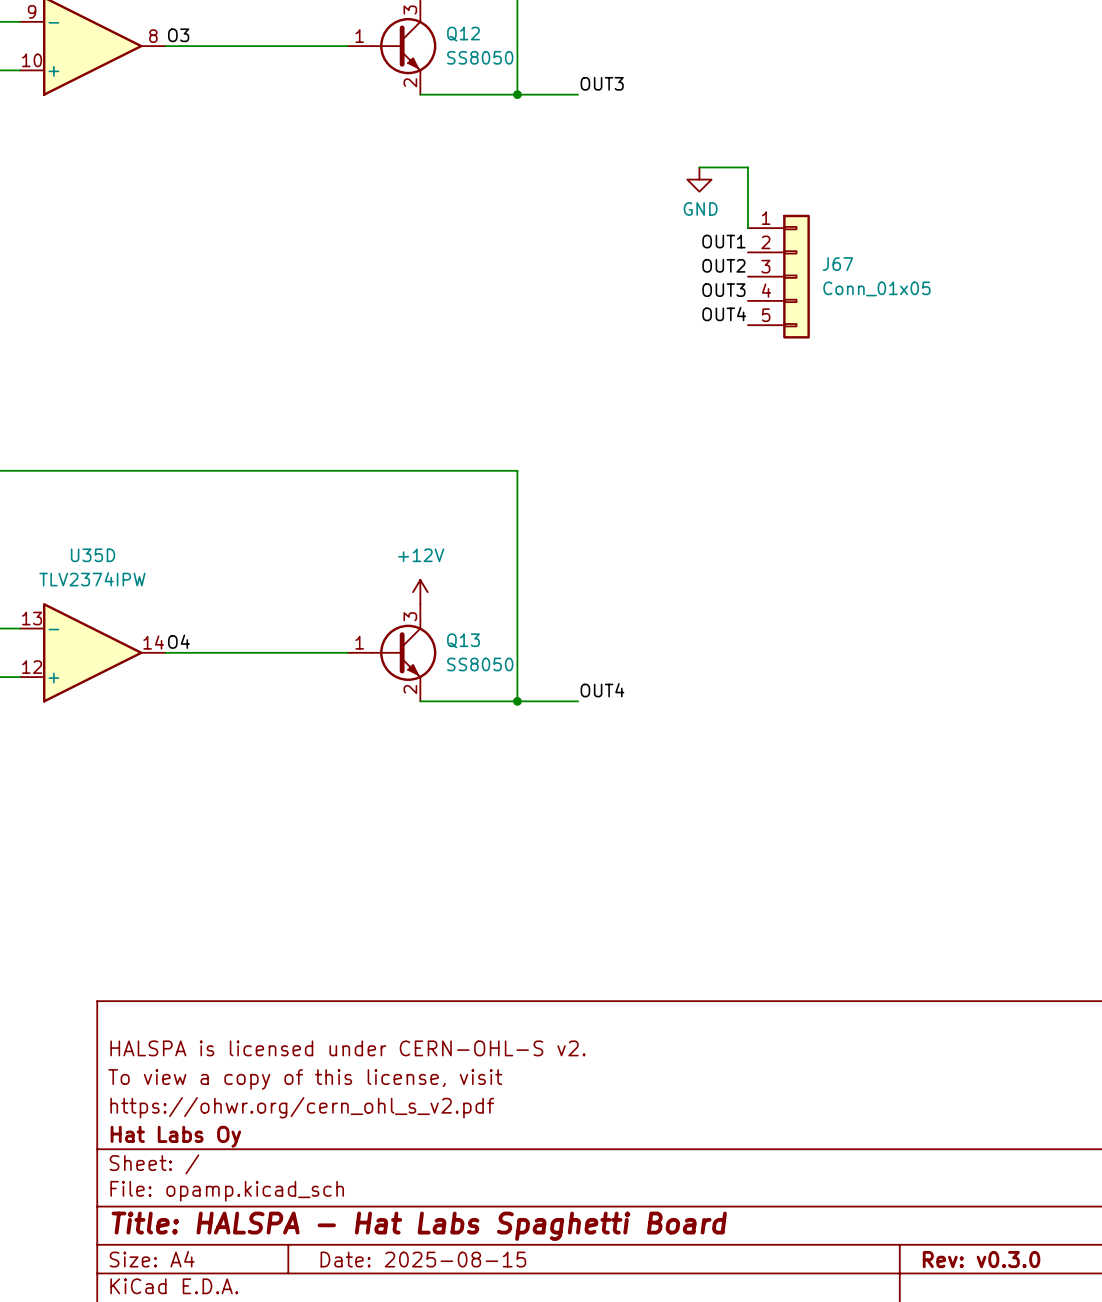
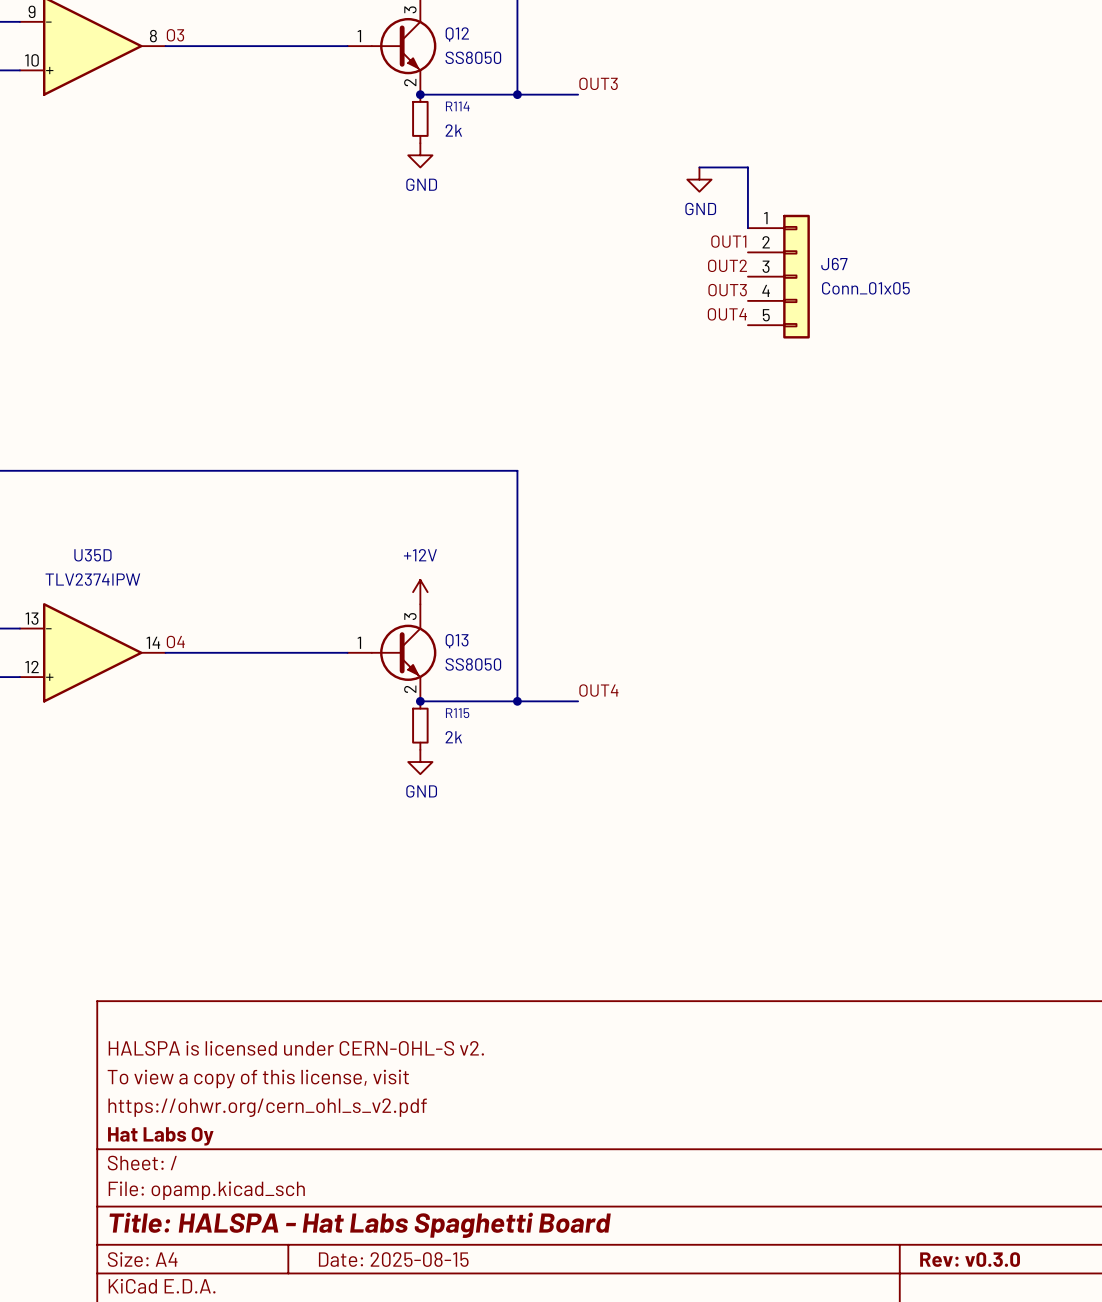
junction: none -> (420, 94)
R114: none -> 2k (420, 118)
power symbol: none -> GND (420, 155)
junction: none -> (420, 701)
R115: none -> 2k (420, 725)
power symbol: none -> GND (420, 762)

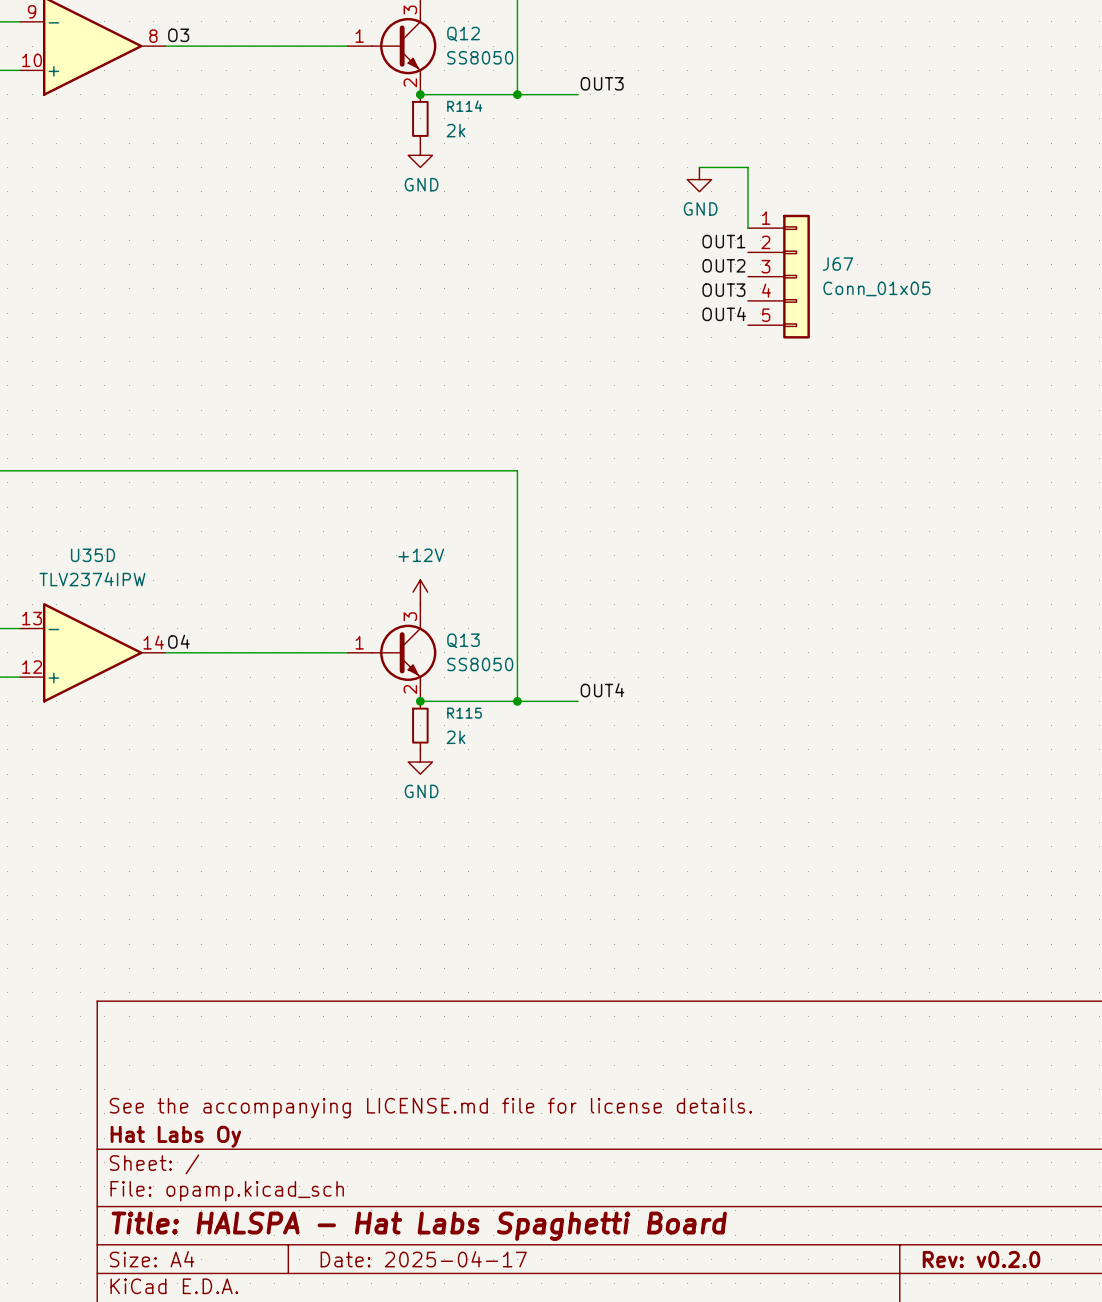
title block: HALSPA is licensed under CERN-OHL-S v2. (296, 1048) -> none
title block: To view a copy of this license, visit (258, 1079) -> none
title block: https://ohwr.org/cern_ohl_s_v2.pdf (267, 1107) -> See the accompanying LICENSE.md file for license details. (430, 1108)
title block: Date: 2025-08-15 (393, 1259) -> Date: 2025-04-17 (423, 1259)
title block: Rev: v0.3.0 (970, 1259) -> Rev: v0.2.0 (981, 1259)

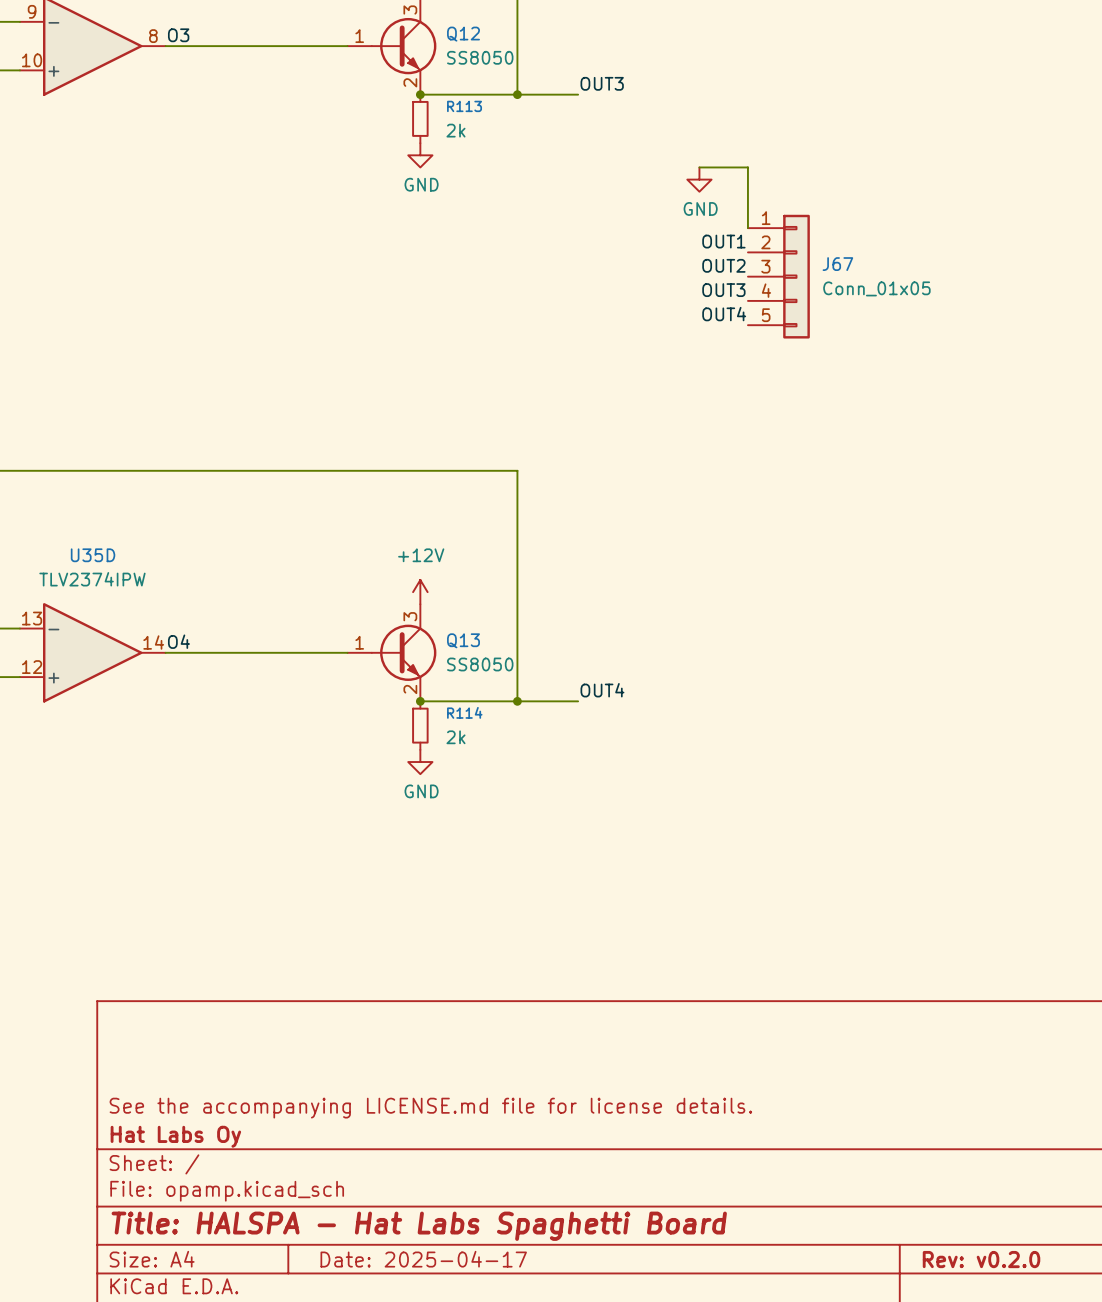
R114 name: R114 (464, 106) -> R113 (464, 106)
R115 name: R115 (464, 713) -> R114 (464, 712)

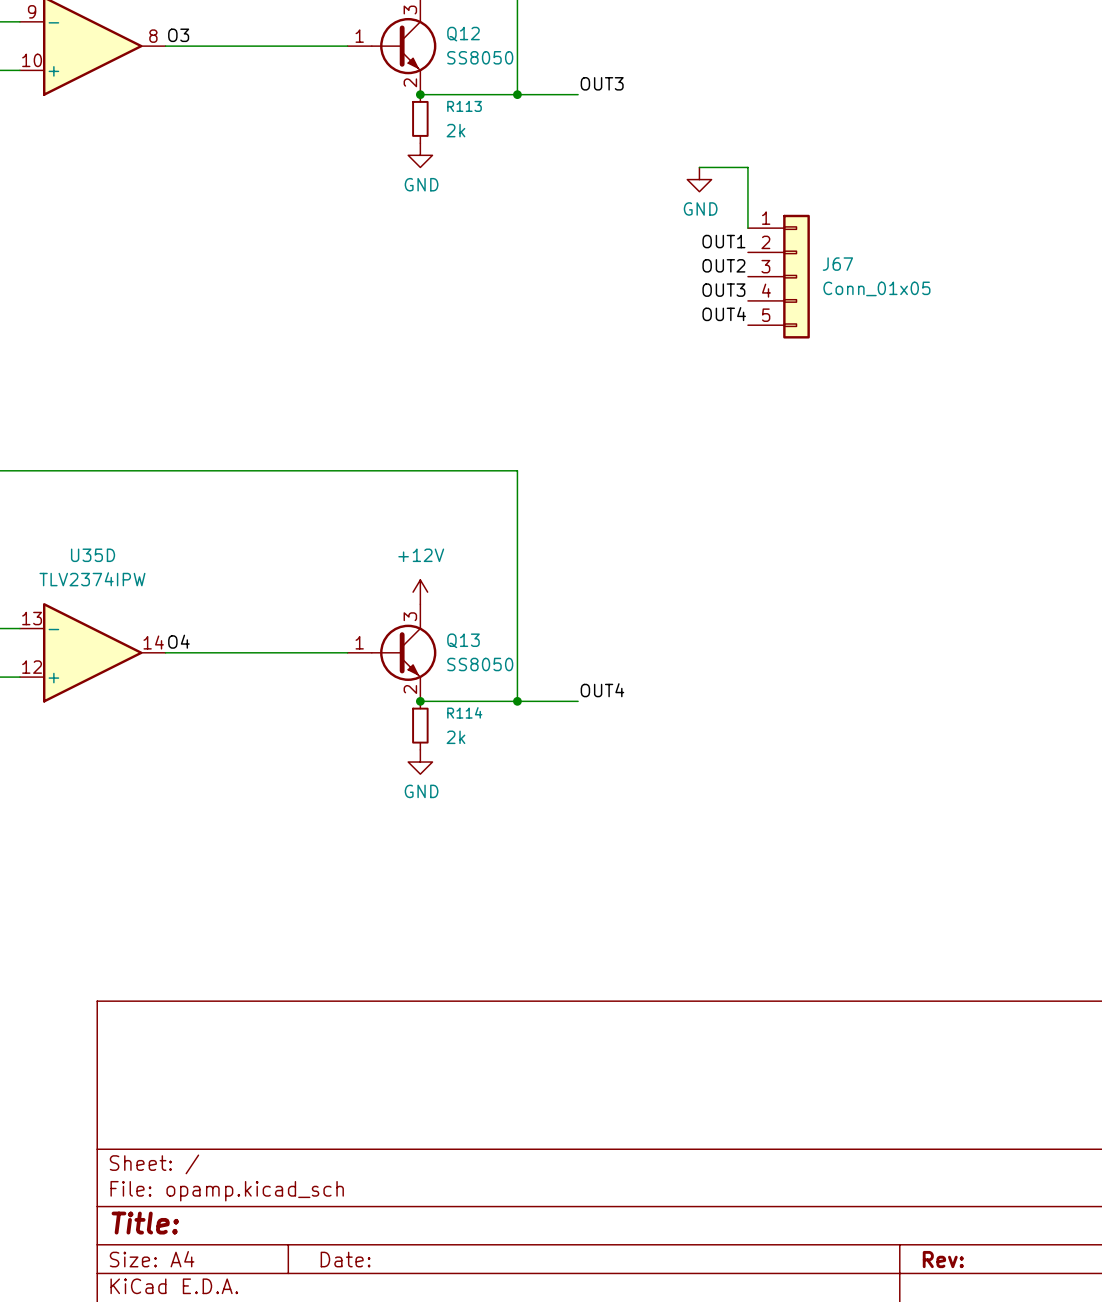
title block: See the accompanying LICENSE.md file for license details. (430, 1108) -> none
title block: Hat Labs Oy (175, 1136) -> none
title block: Title: HALSPA - Hat Labs Spaghetti Board (419, 1226) -> Title: (145, 1223)
title block: Date: 2025-04-17 (423, 1259) -> Date: (345, 1259)
title block: Rev: v0.2.0 (981, 1259) -> Rev: (943, 1259)

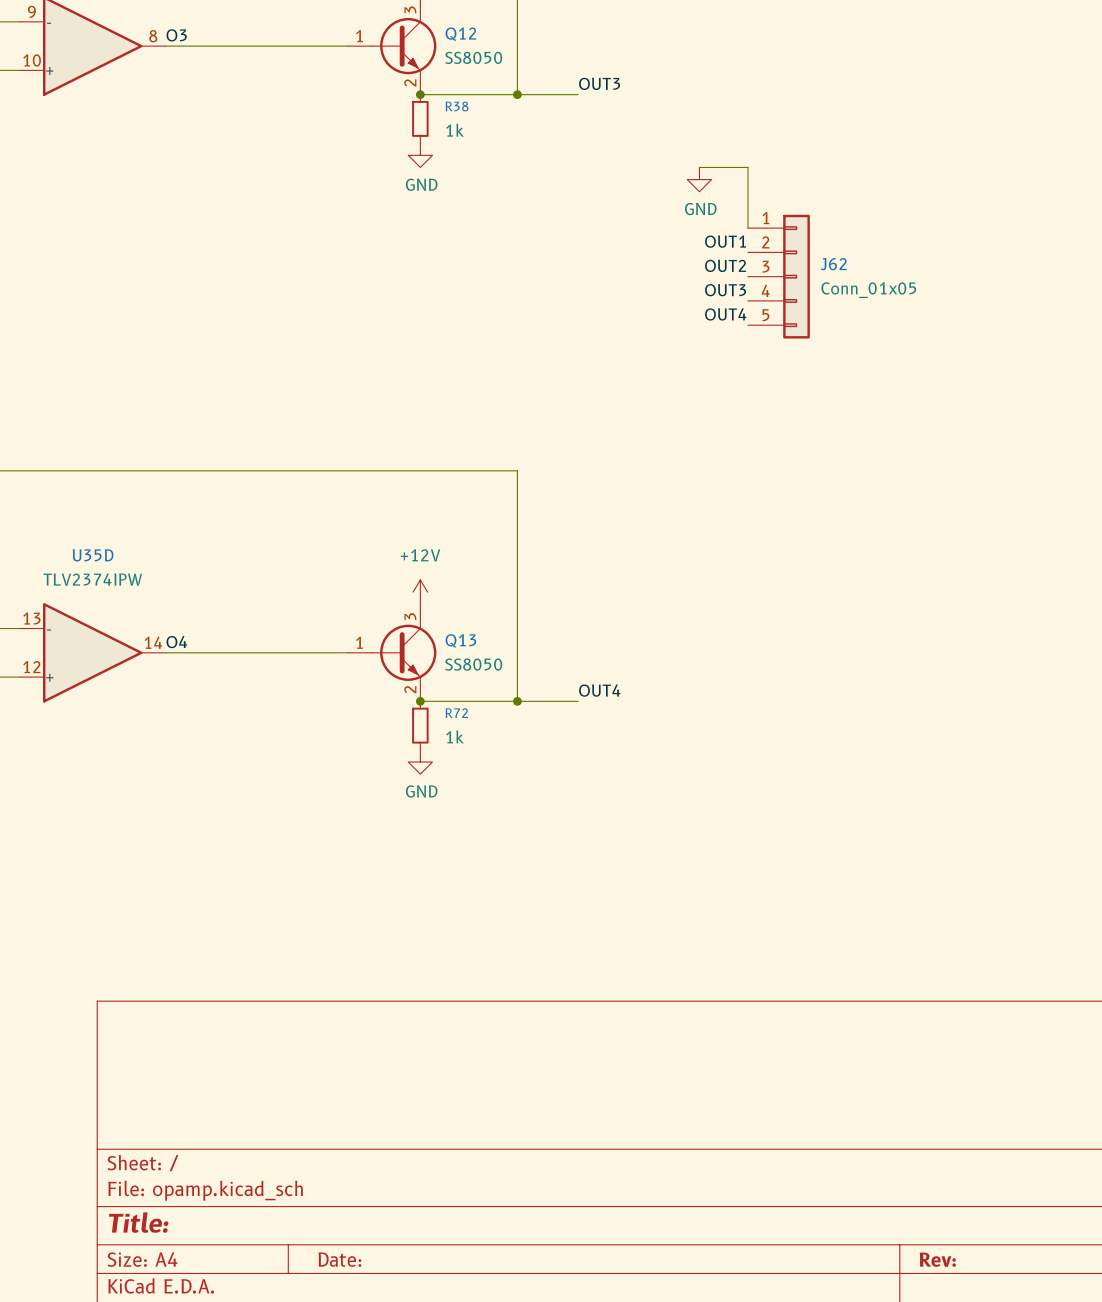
R113 name: R113 (464, 106) -> R38 (457, 106)
R113 value: 2k (455, 130) -> 1k (454, 130)
J67 name: J67 (837, 264) -> J62 (833, 264)
R114 name: R114 (464, 712) -> R72 (456, 713)
R114 value: 2k (455, 737) -> 1k (454, 736)

